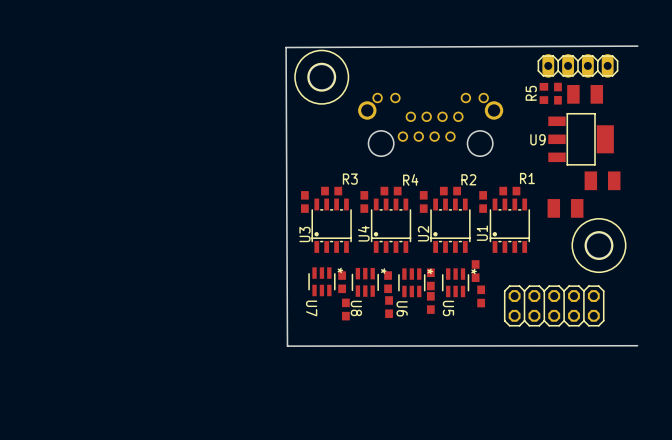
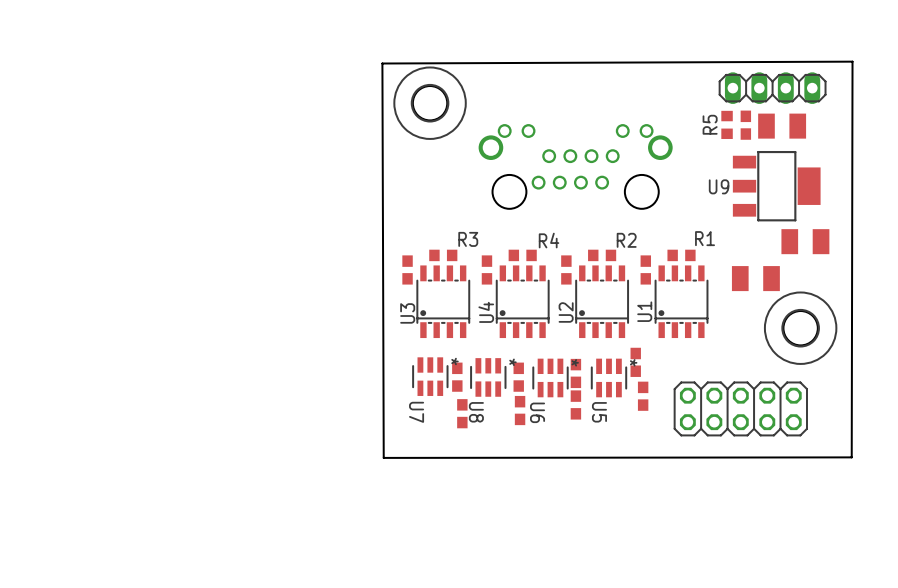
board edge: (286, 47) (287, 346) (637, 345) -> (382, 63) (383, 457) (851, 457) (852, 61)

